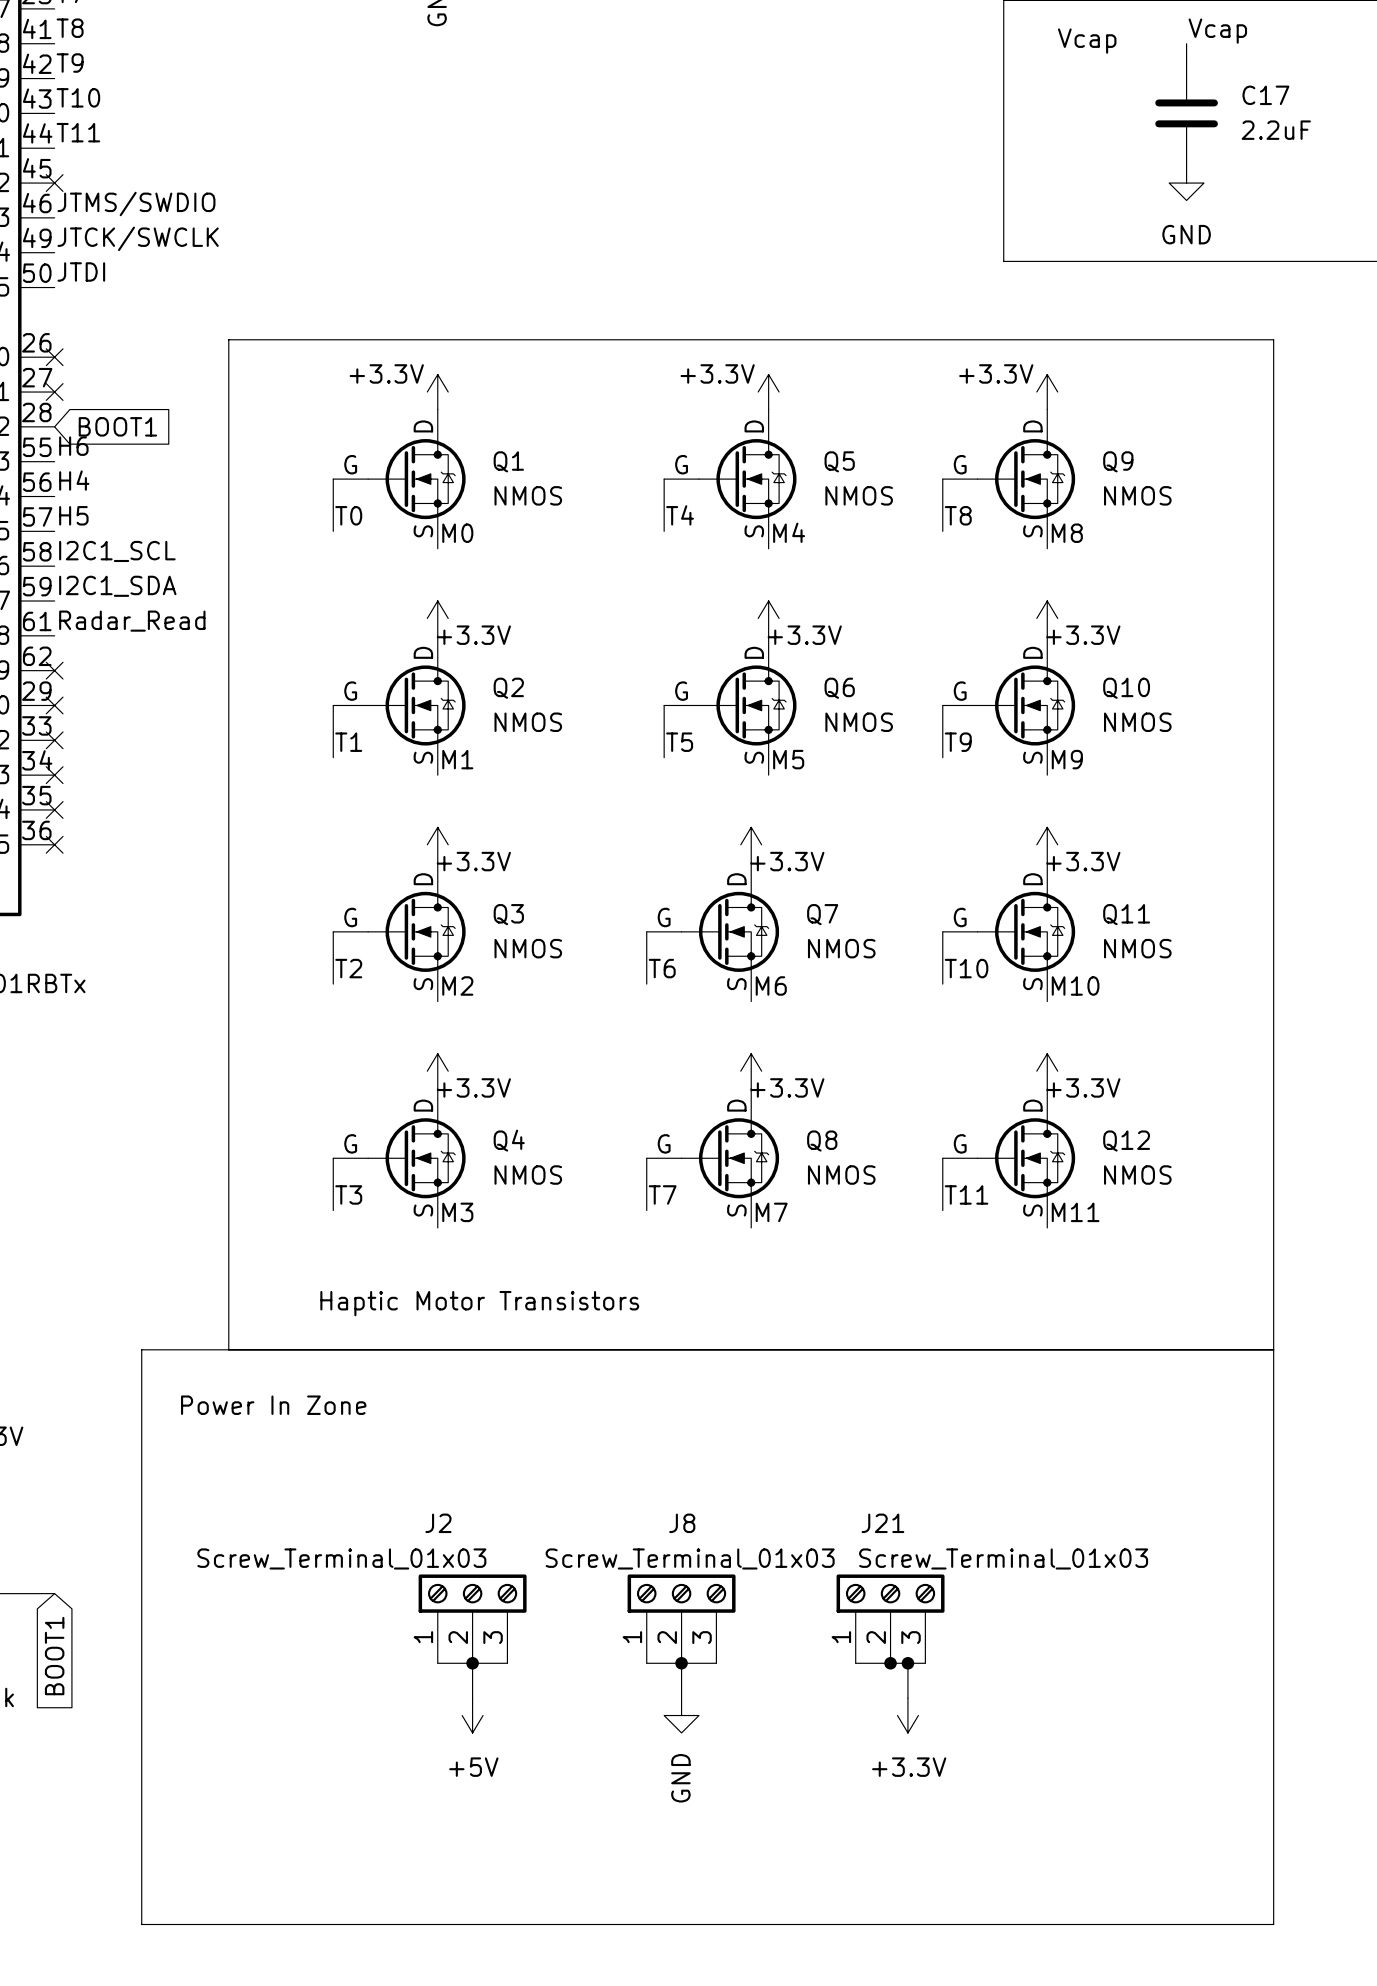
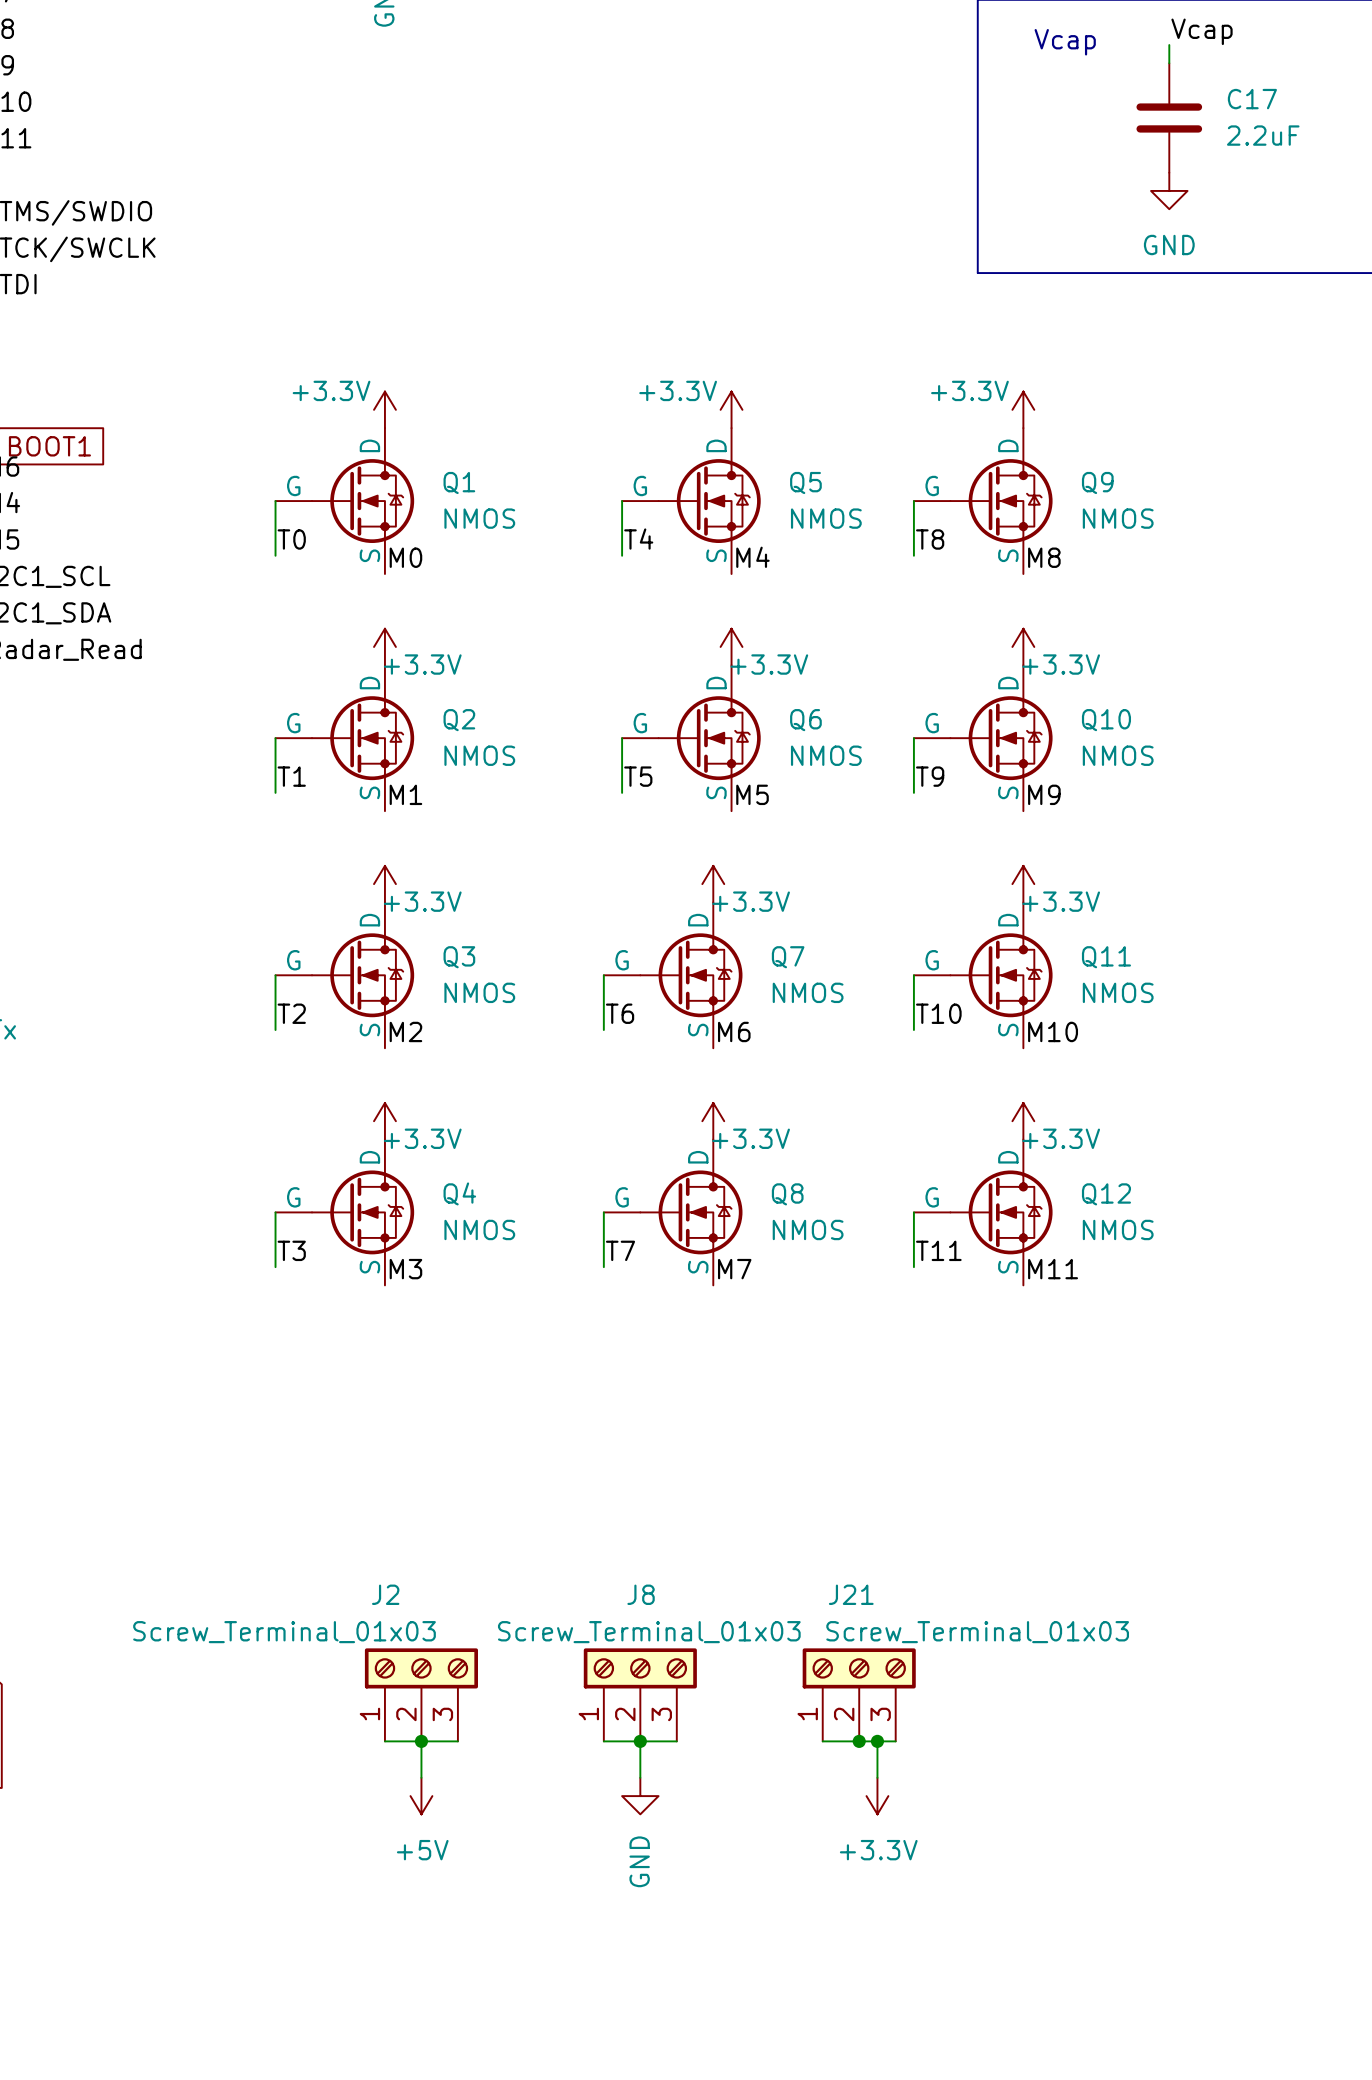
text: Haptic Motor Transistors (479, 1303) -> none
line: (228, 1349) (228, 339) (1273, 339) (1273, 1924) (141, 1924) (141, 1349) (1273, 1349) -> none
text: Power In Zone (273, 1405) -> none

